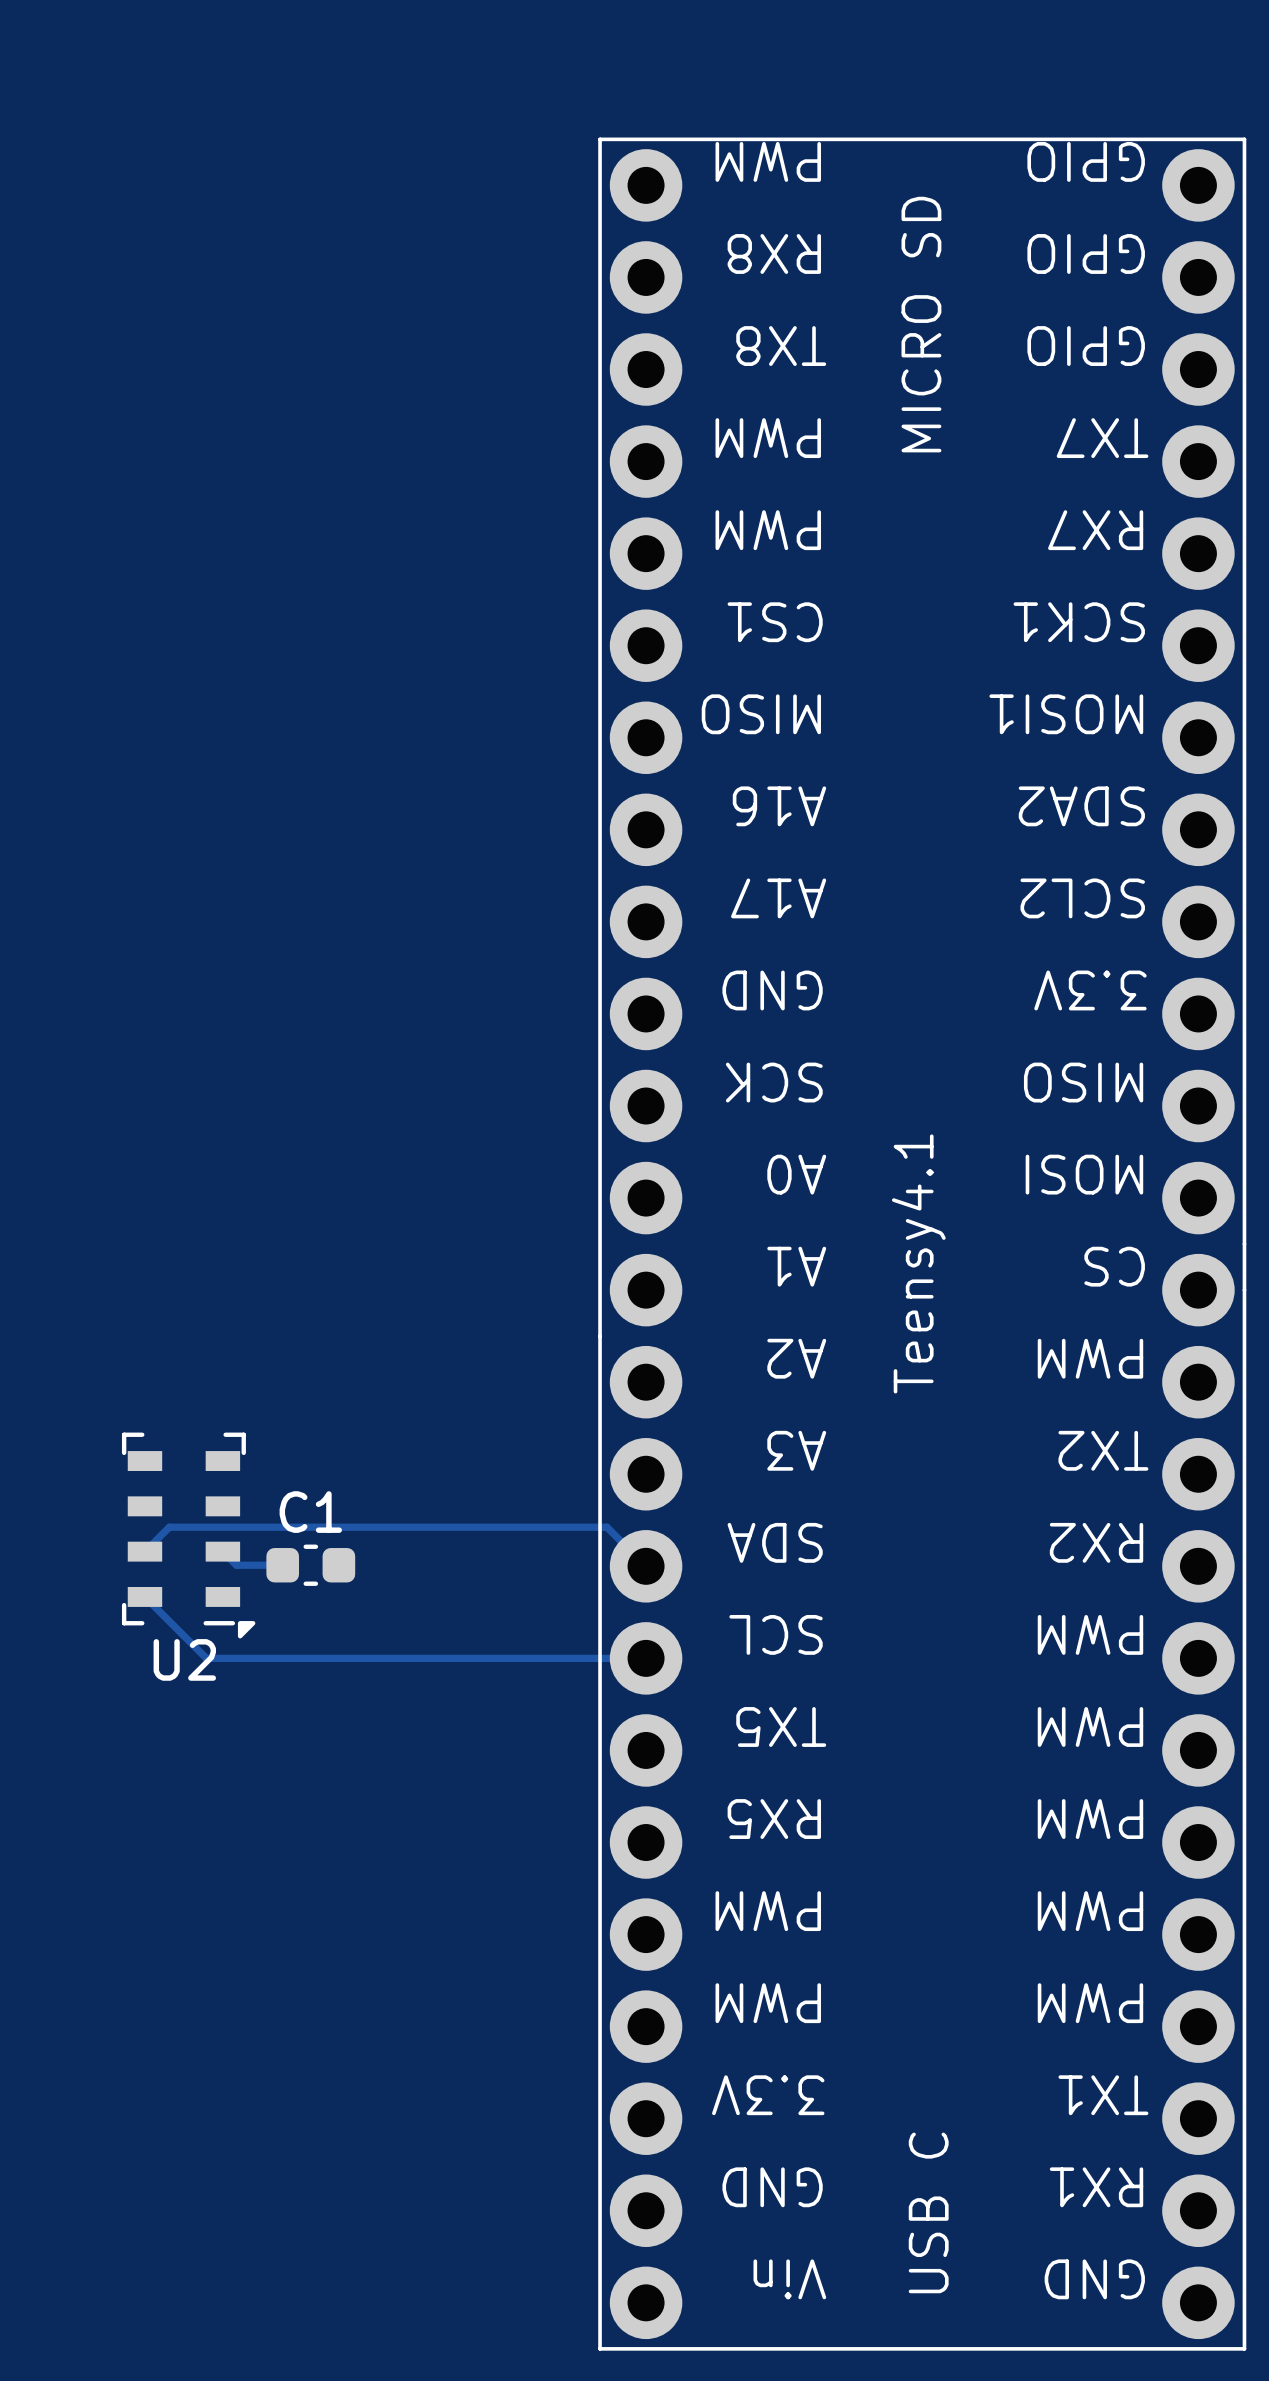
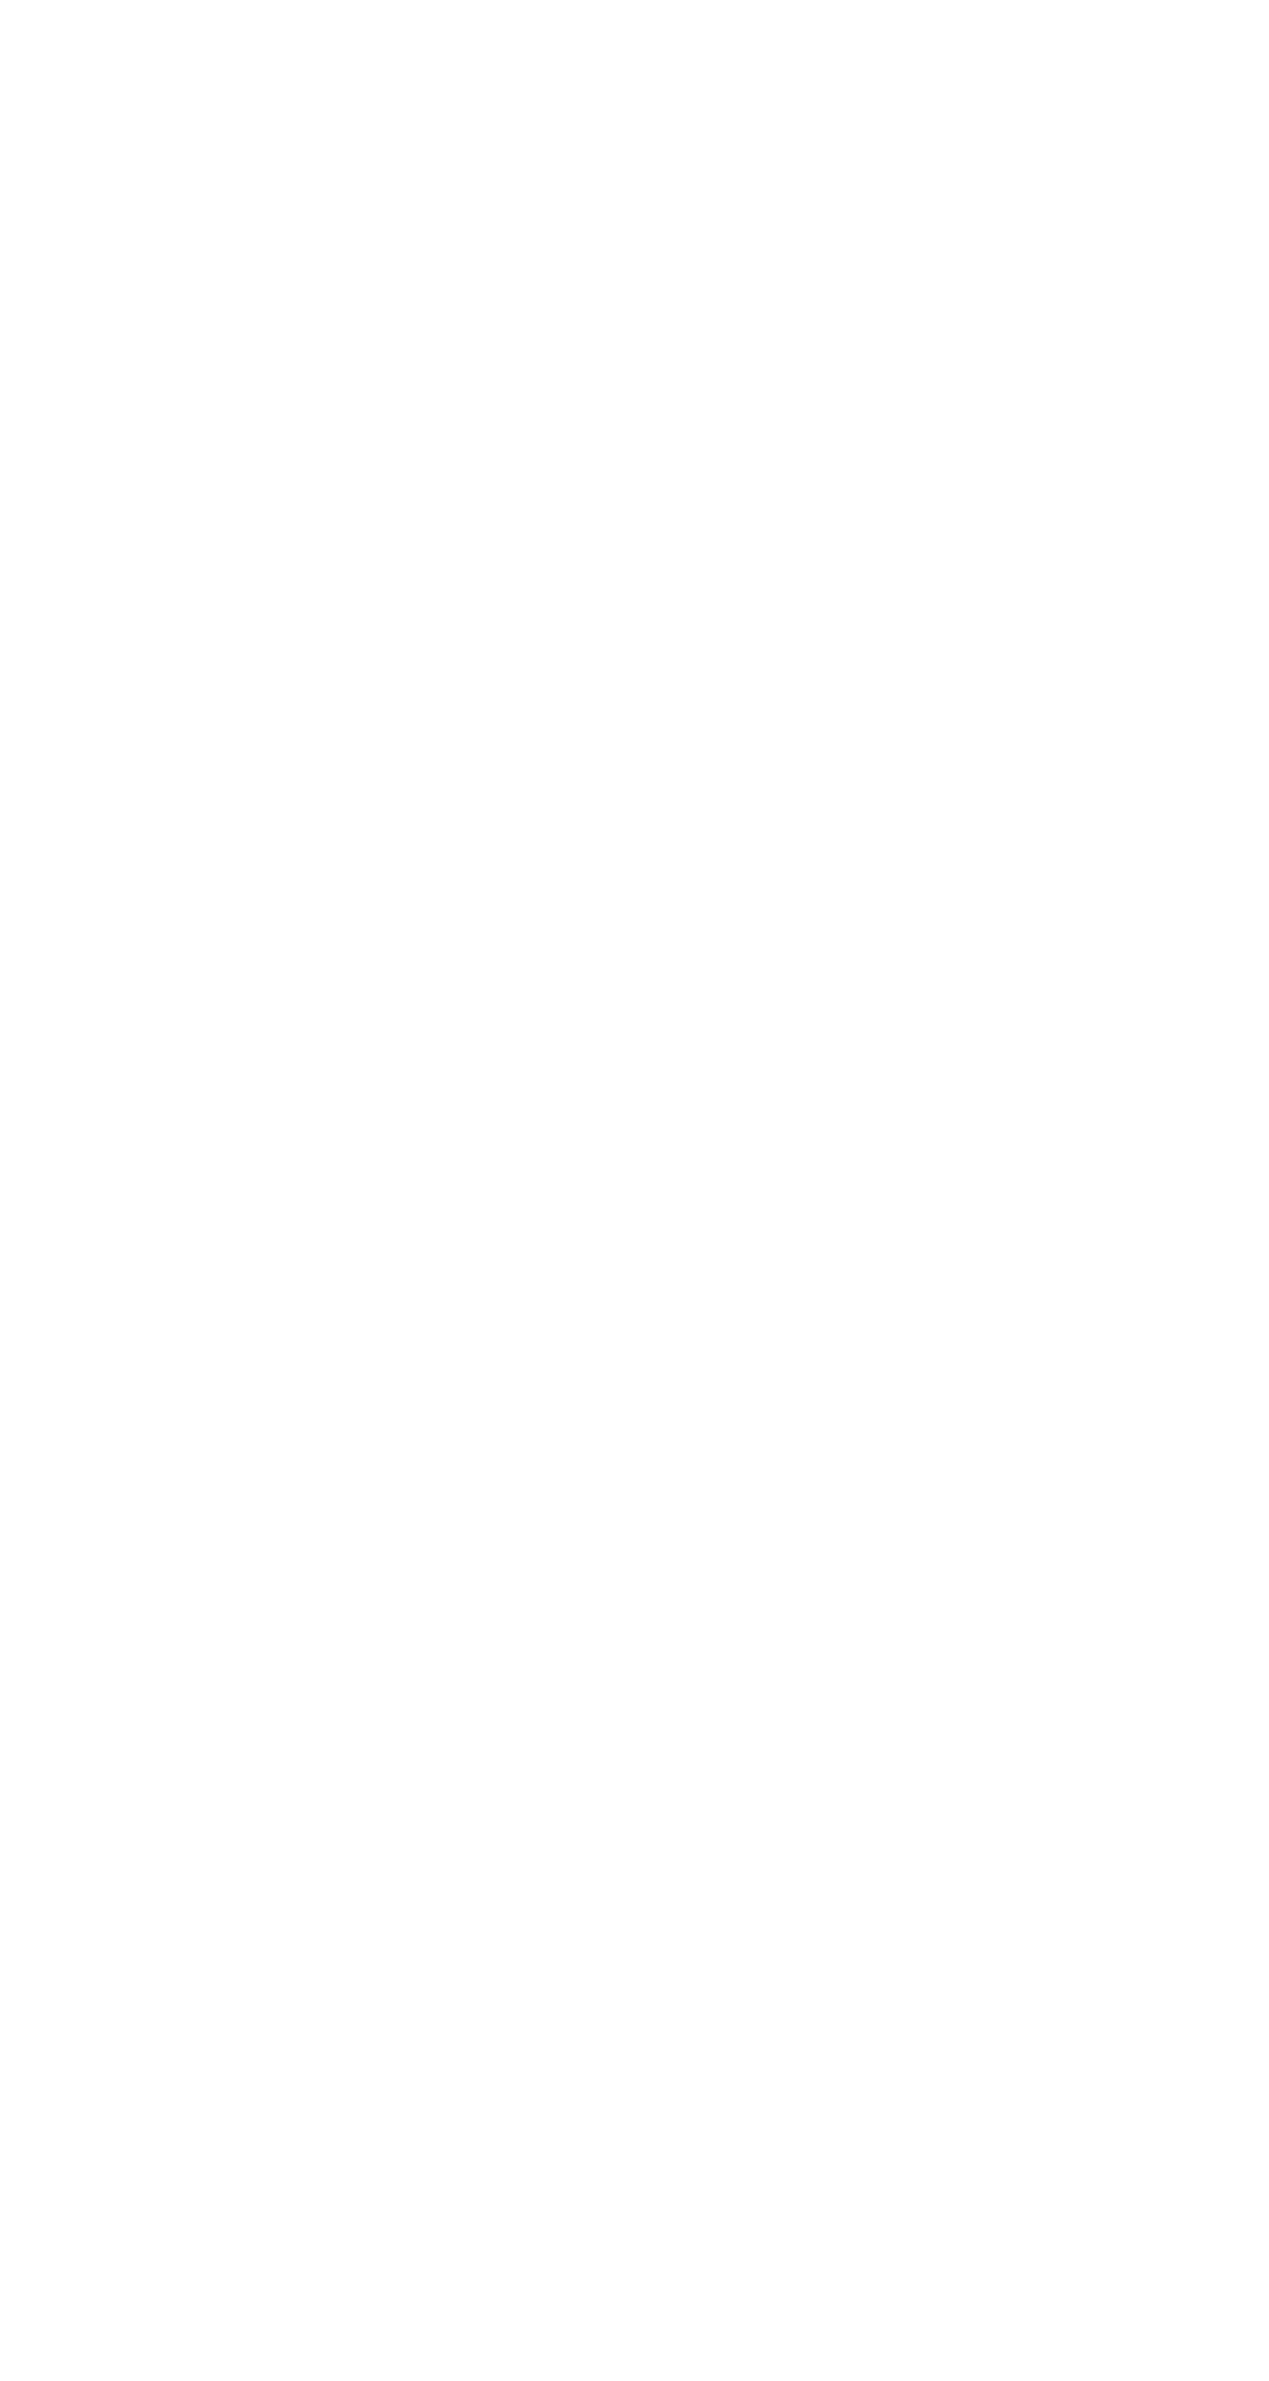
Teensy4.1: (922, 1244) -> none
U2: (188, 1535) -> none
track: (144, 1551) (169, 1527) (606, 1527) (646, 1566) -> none
track: (222, 1551) (236, 1565) (282, 1565) -> none
C1: (310, 1565) -> none
track: (144, 1596) (206, 1658) (646, 1658) -> none

